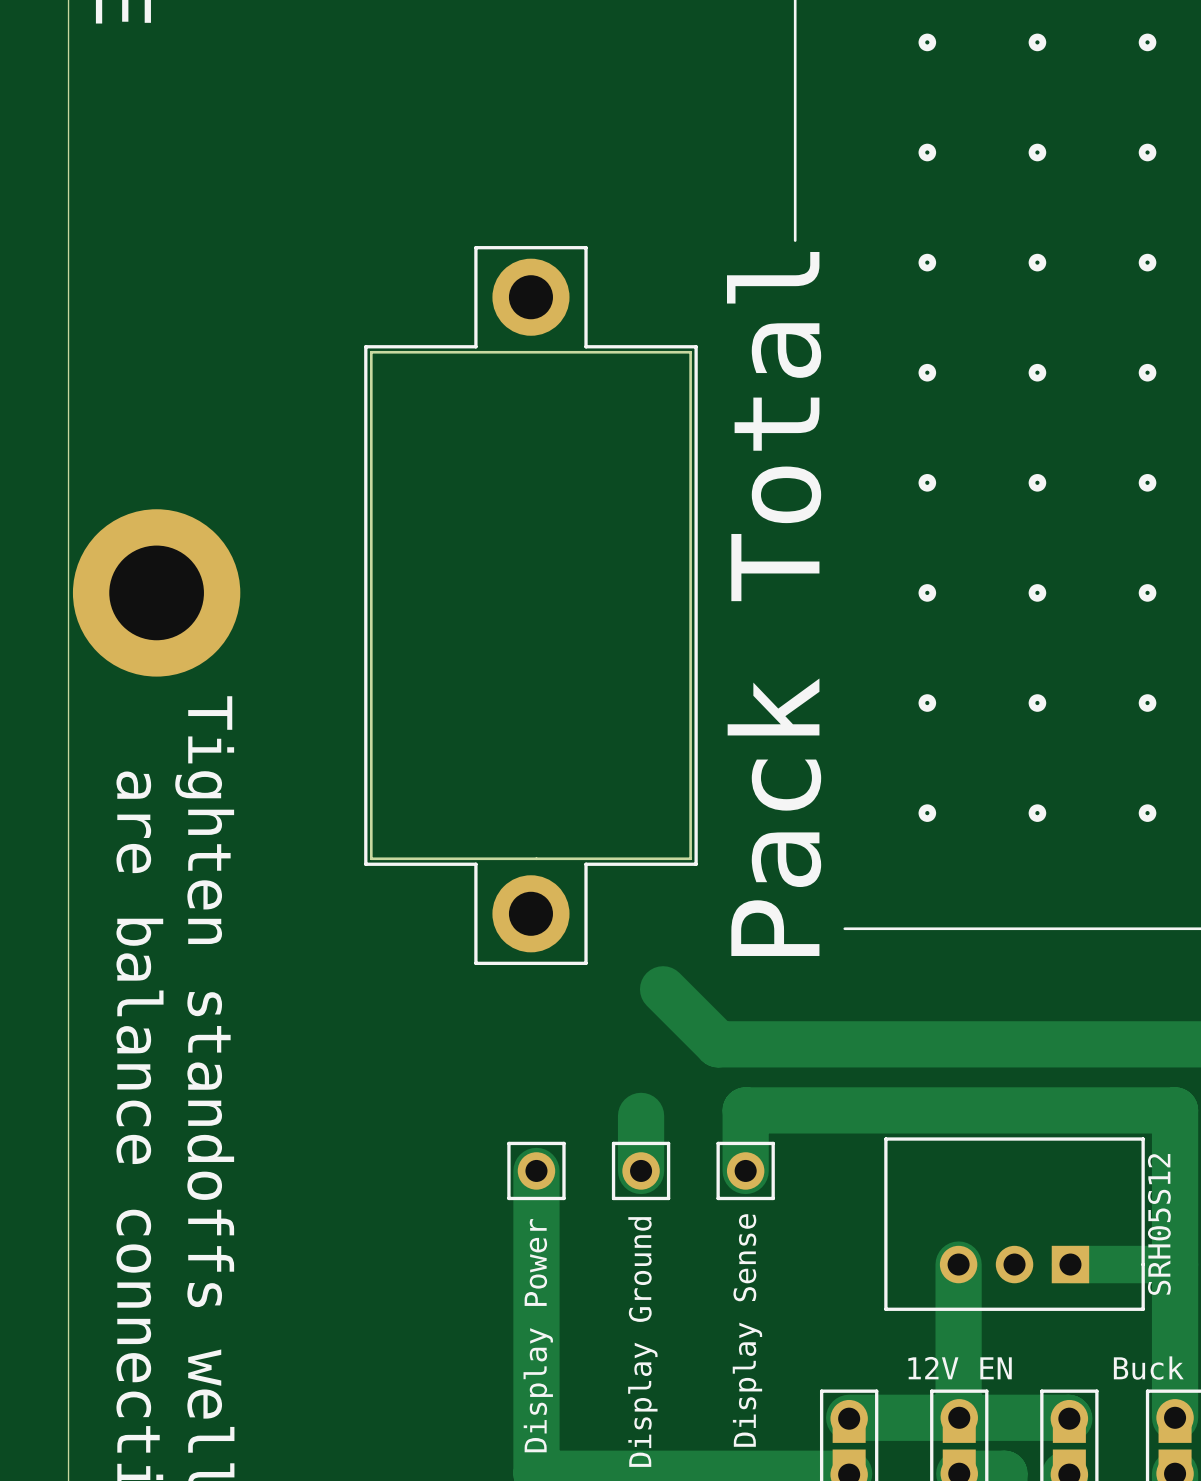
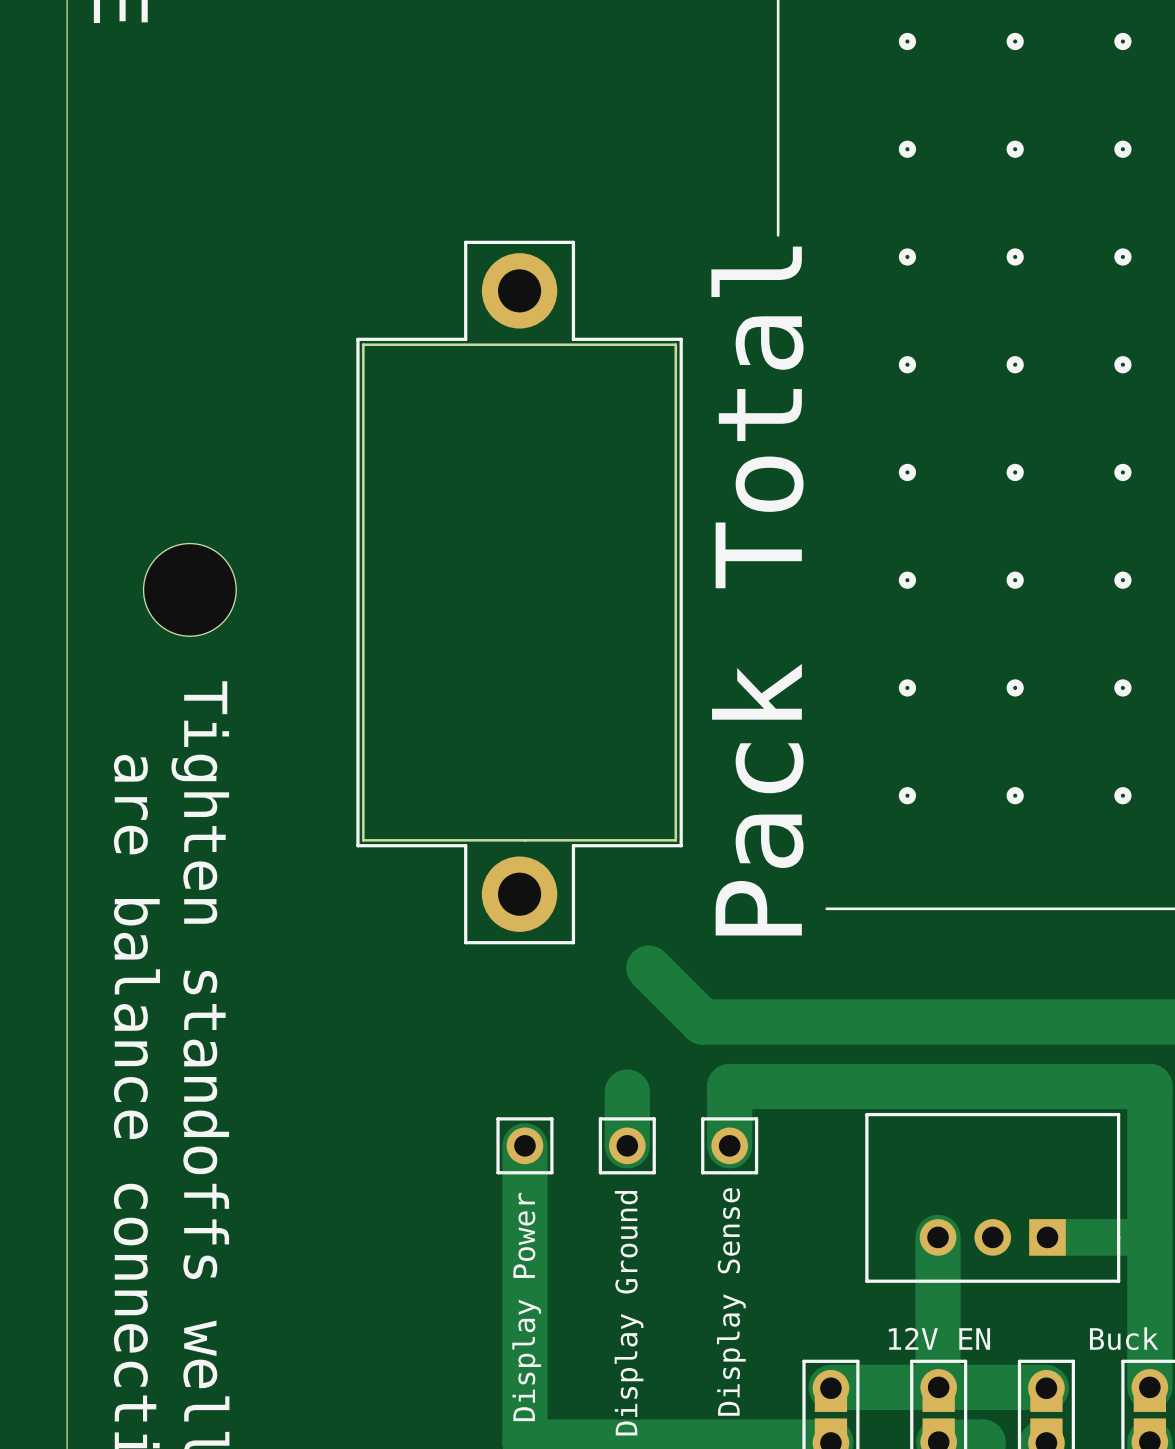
part: (156, 592) -> none
part: none -> (189, 589)
part text: SRH05S12 (1159, 1224) -> none

